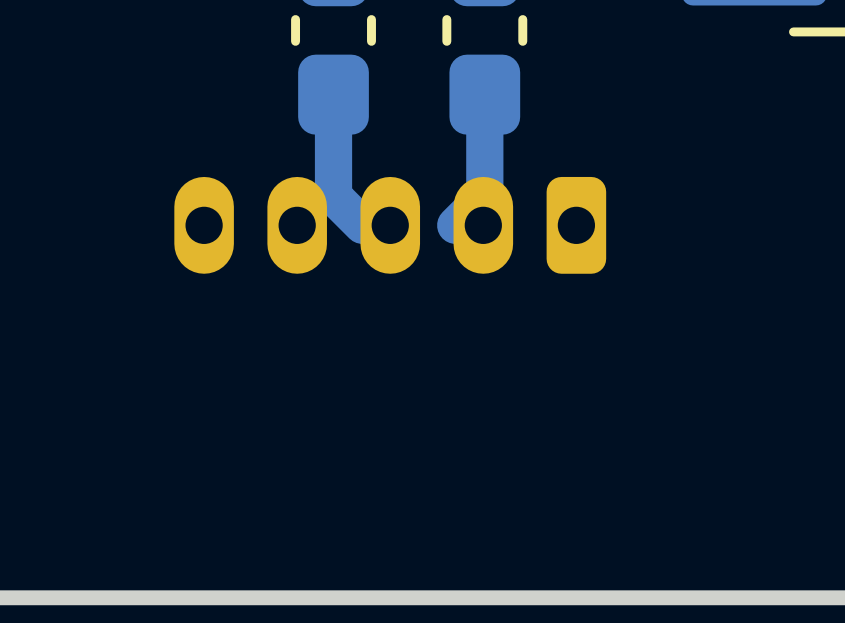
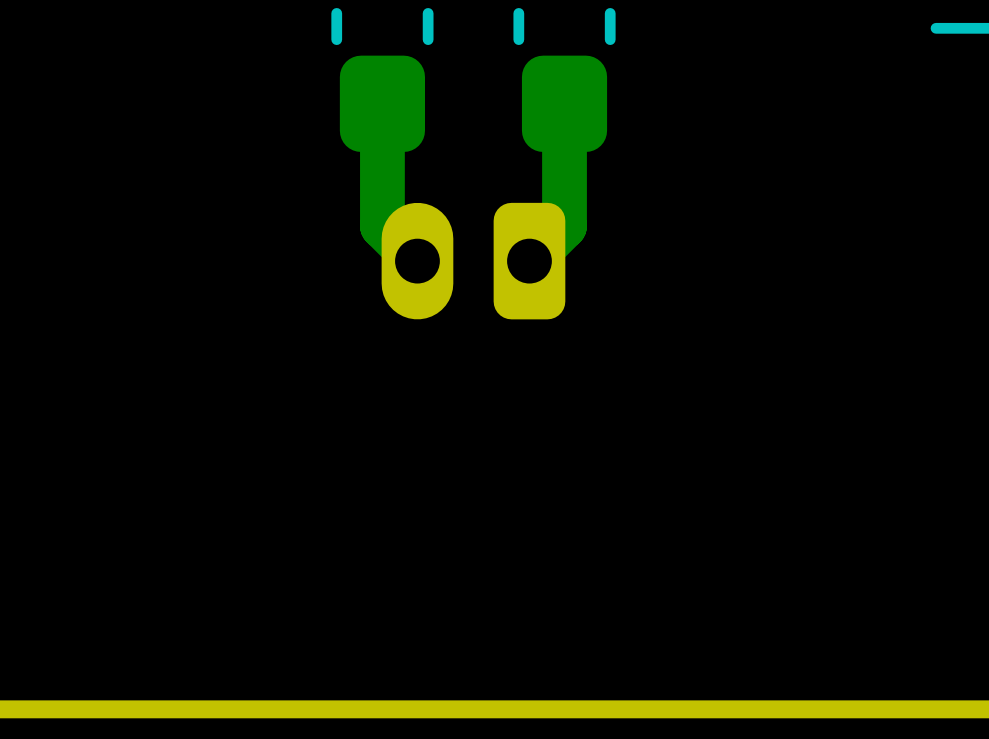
part footprint: [174, 176, 607, 274] -> [381, 202, 566, 320]

